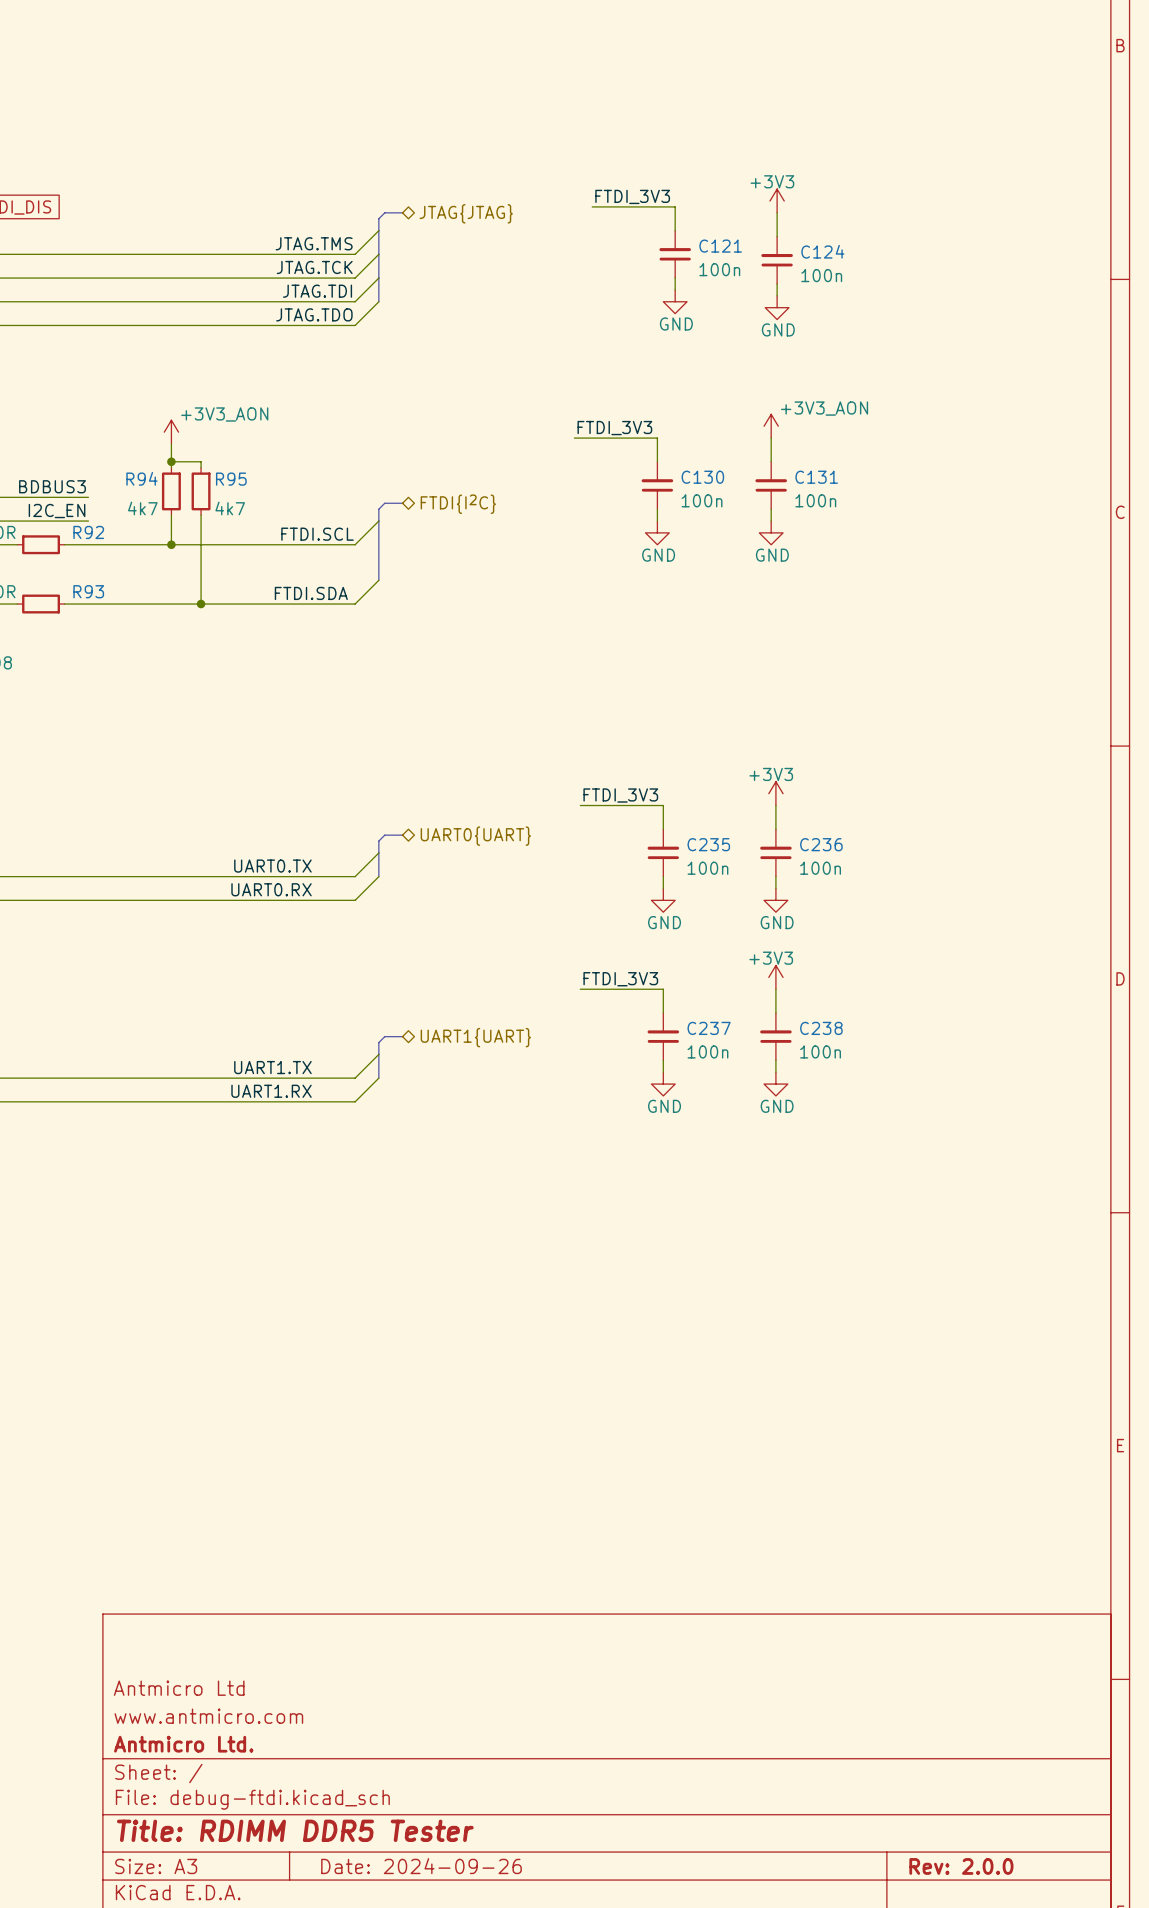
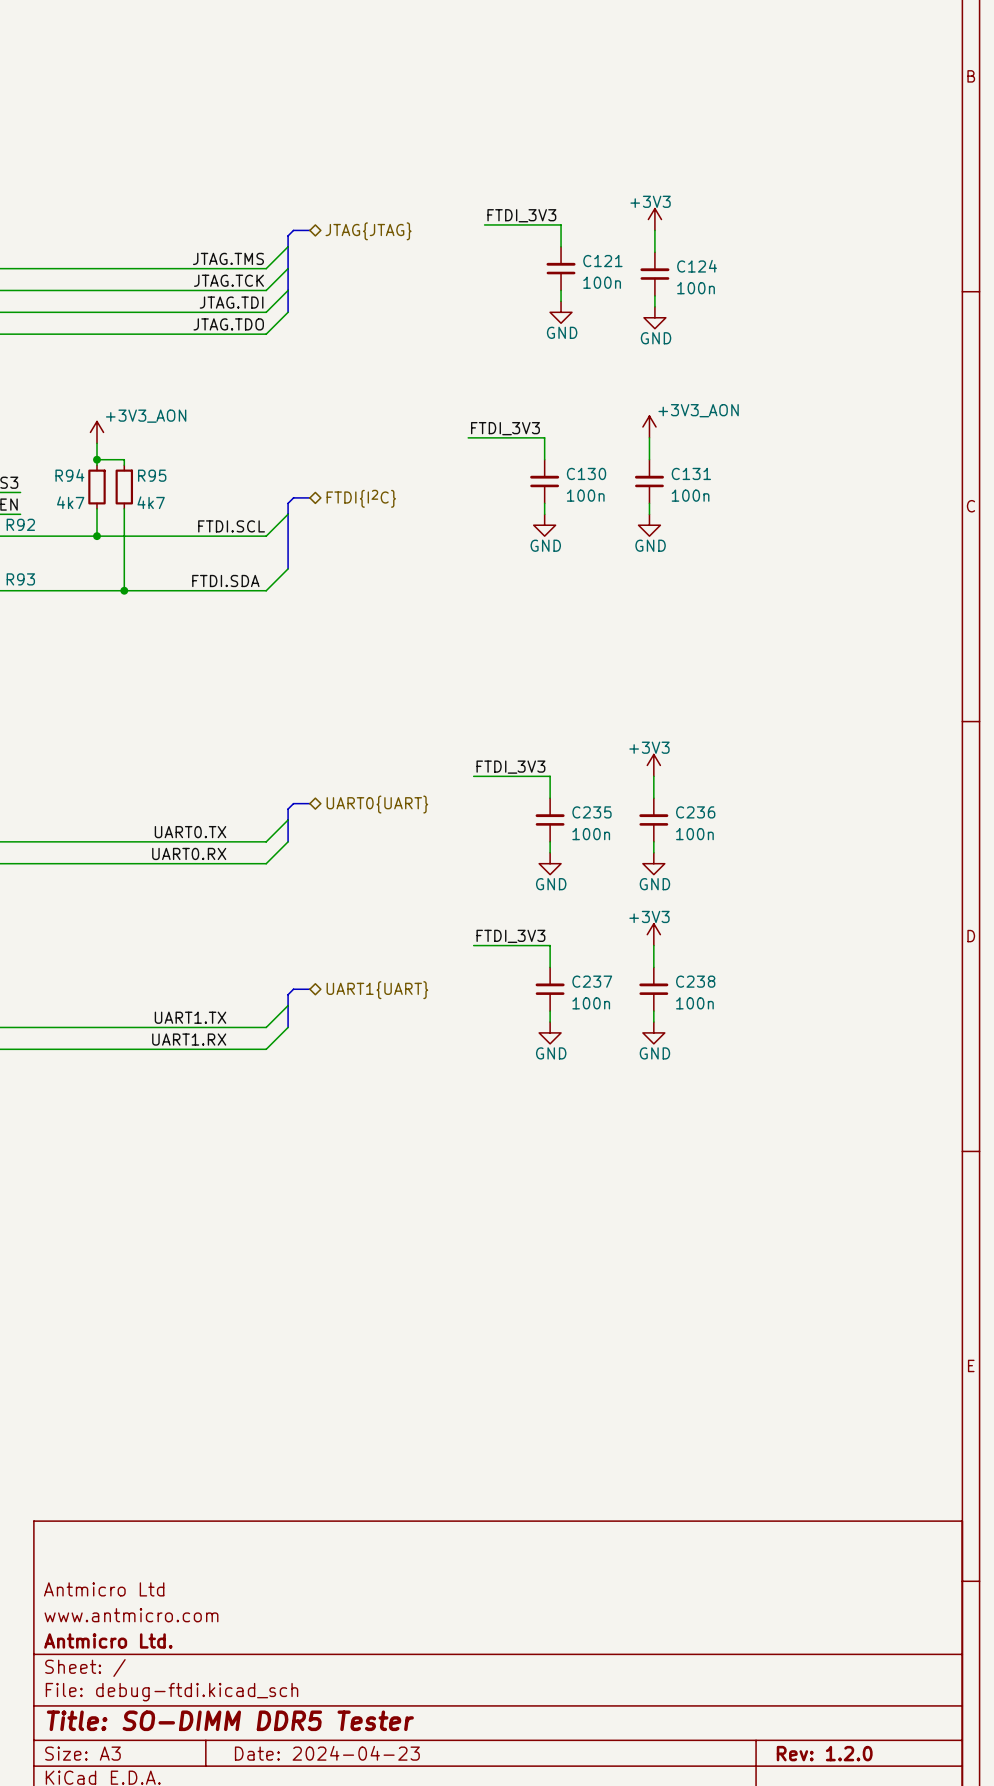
title block: Title: RDIMM DDR5 Tester (295, 1830) -> Title: SO-DIMM DDR5 Tester (230, 1720)
title block: Date: 2024-09-26 (421, 1866) -> Date: 2024-04-23 (327, 1753)
title block: Rev: 2.0.0 (961, 1866) -> Rev: 1.2.0 (824, 1753)

